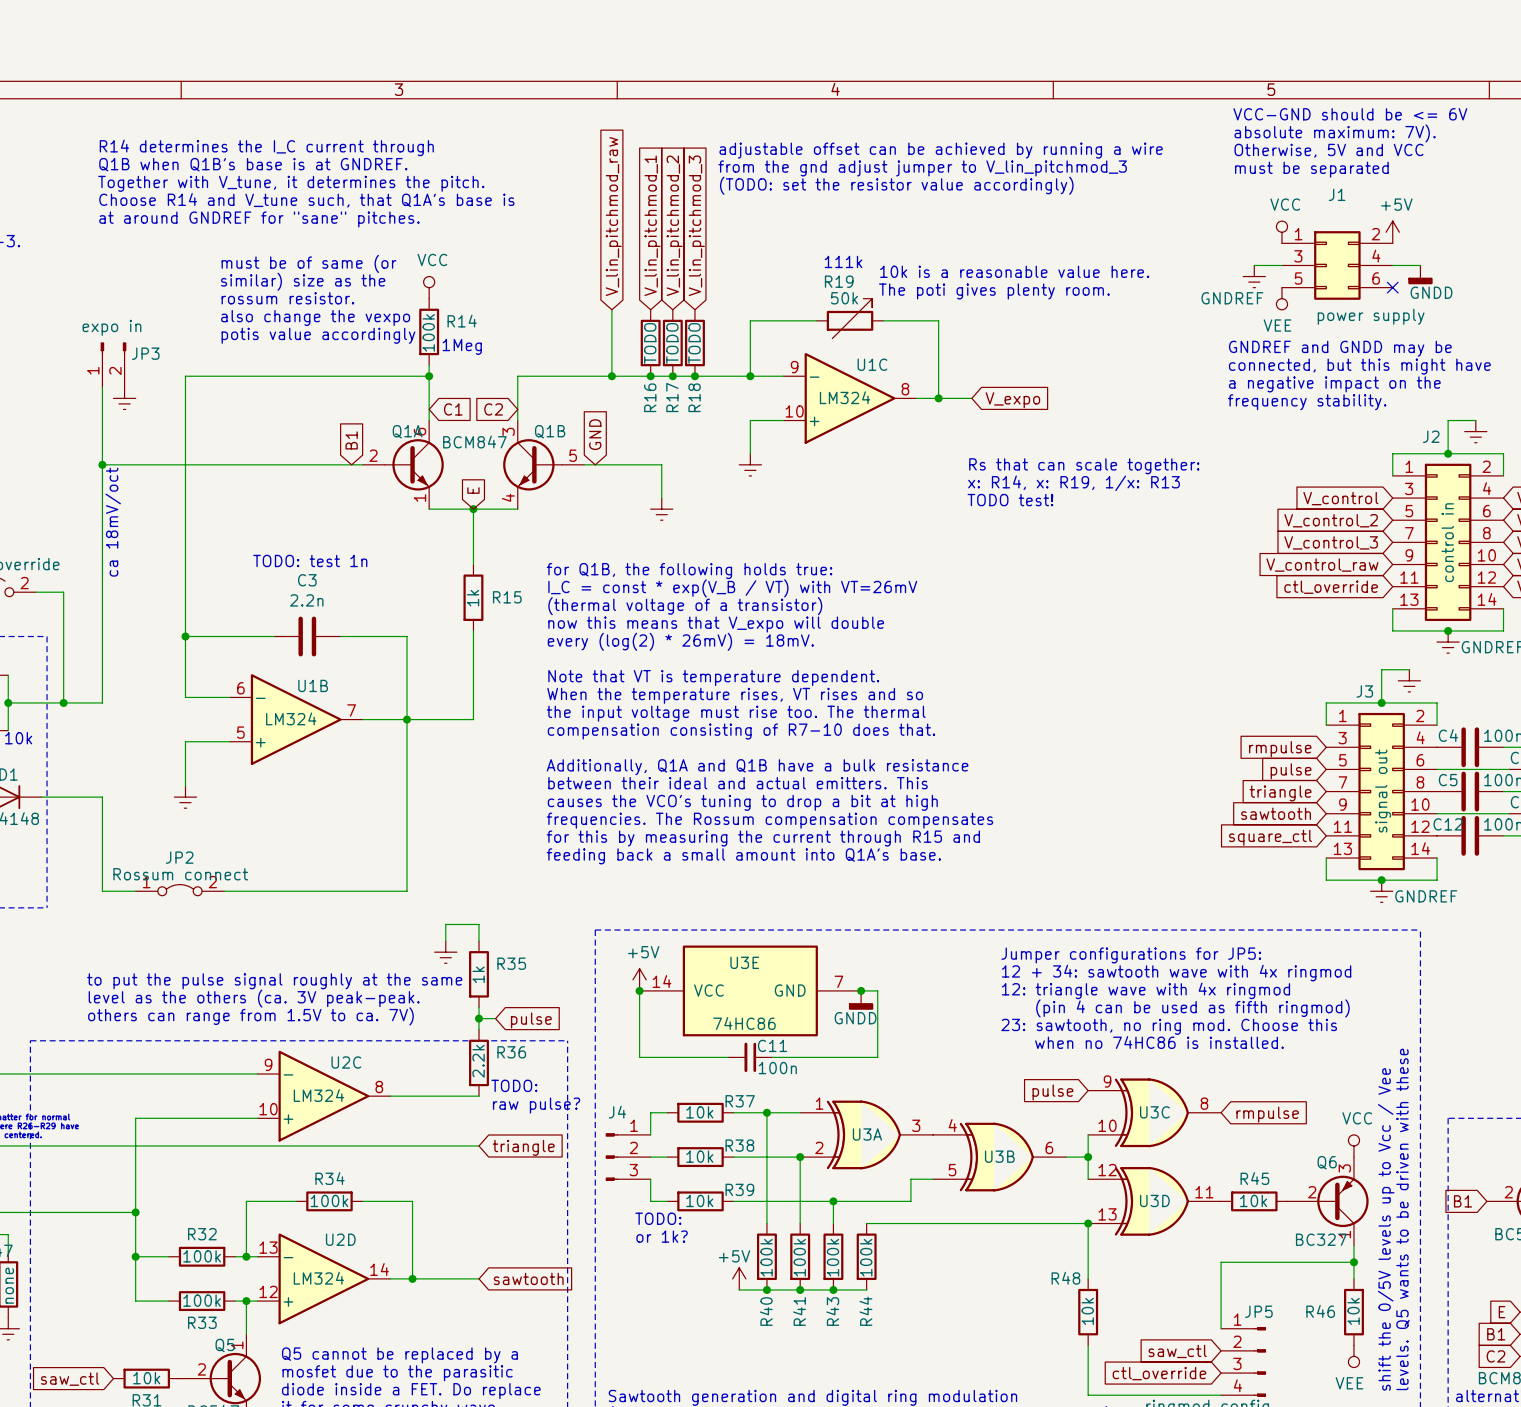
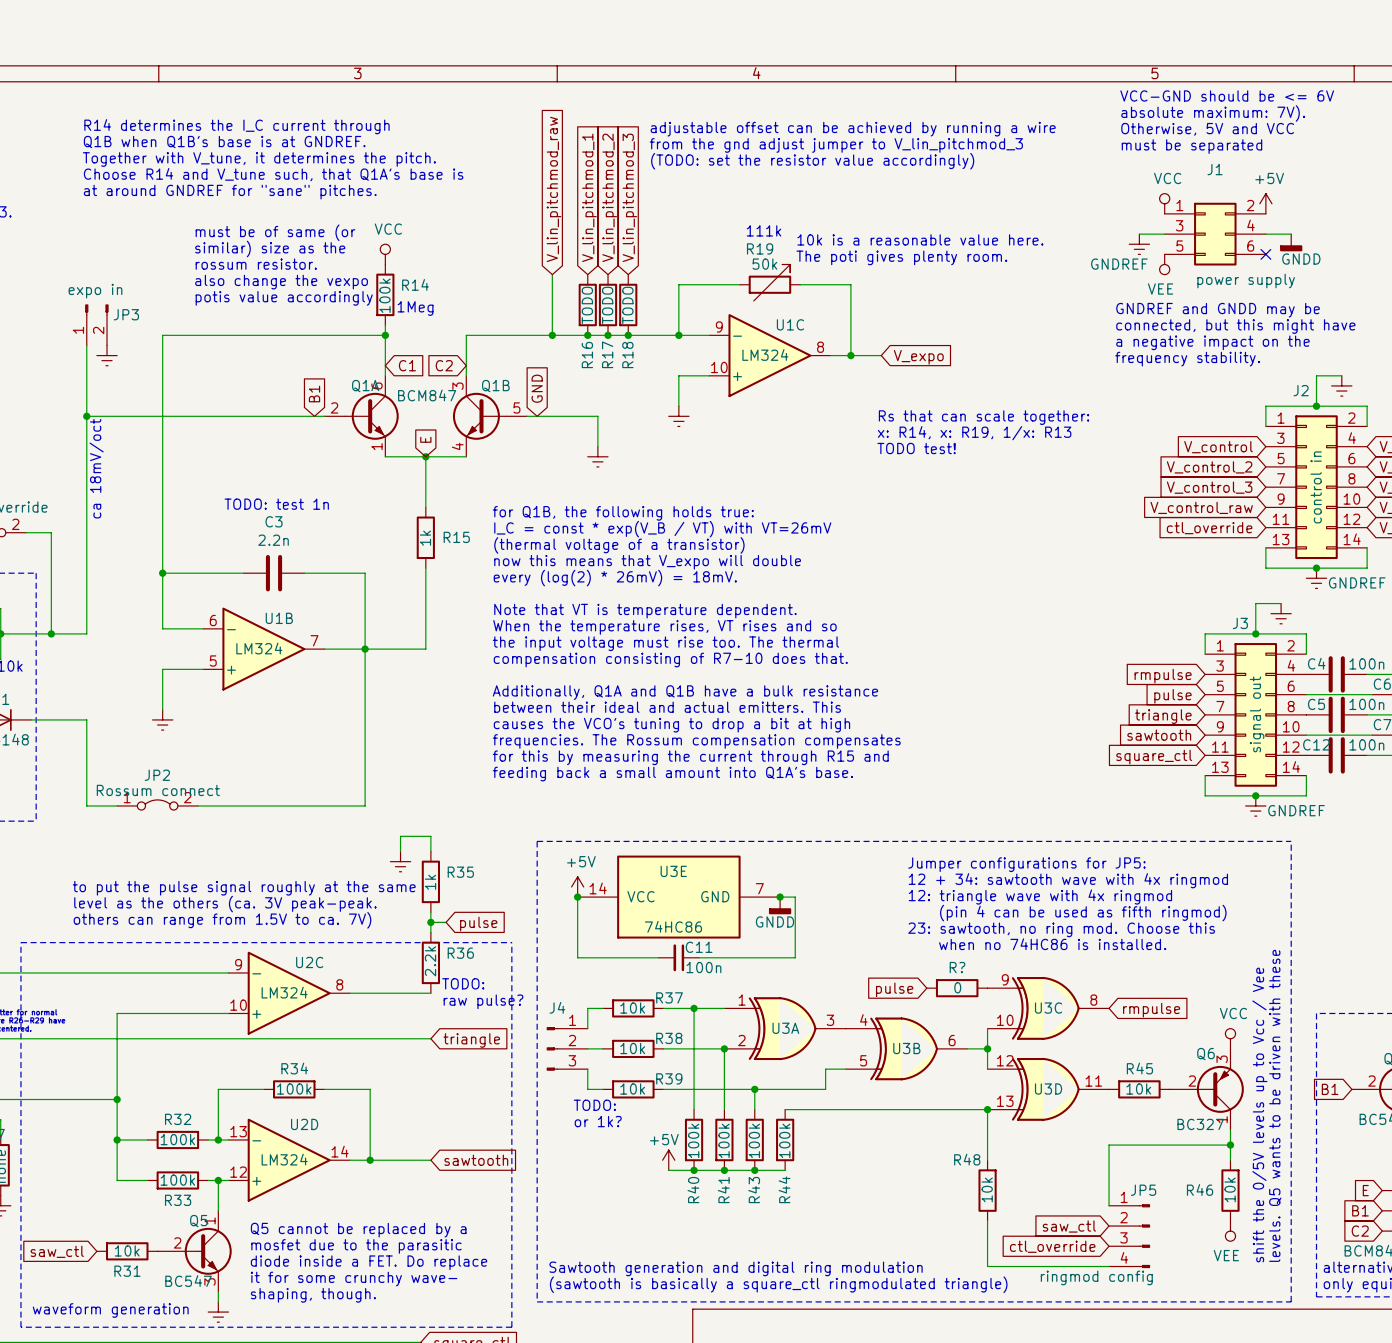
R?: none -> 0 (957, 988)
global label position: pulse (1052, 1092) -> pulse (894, 989)

